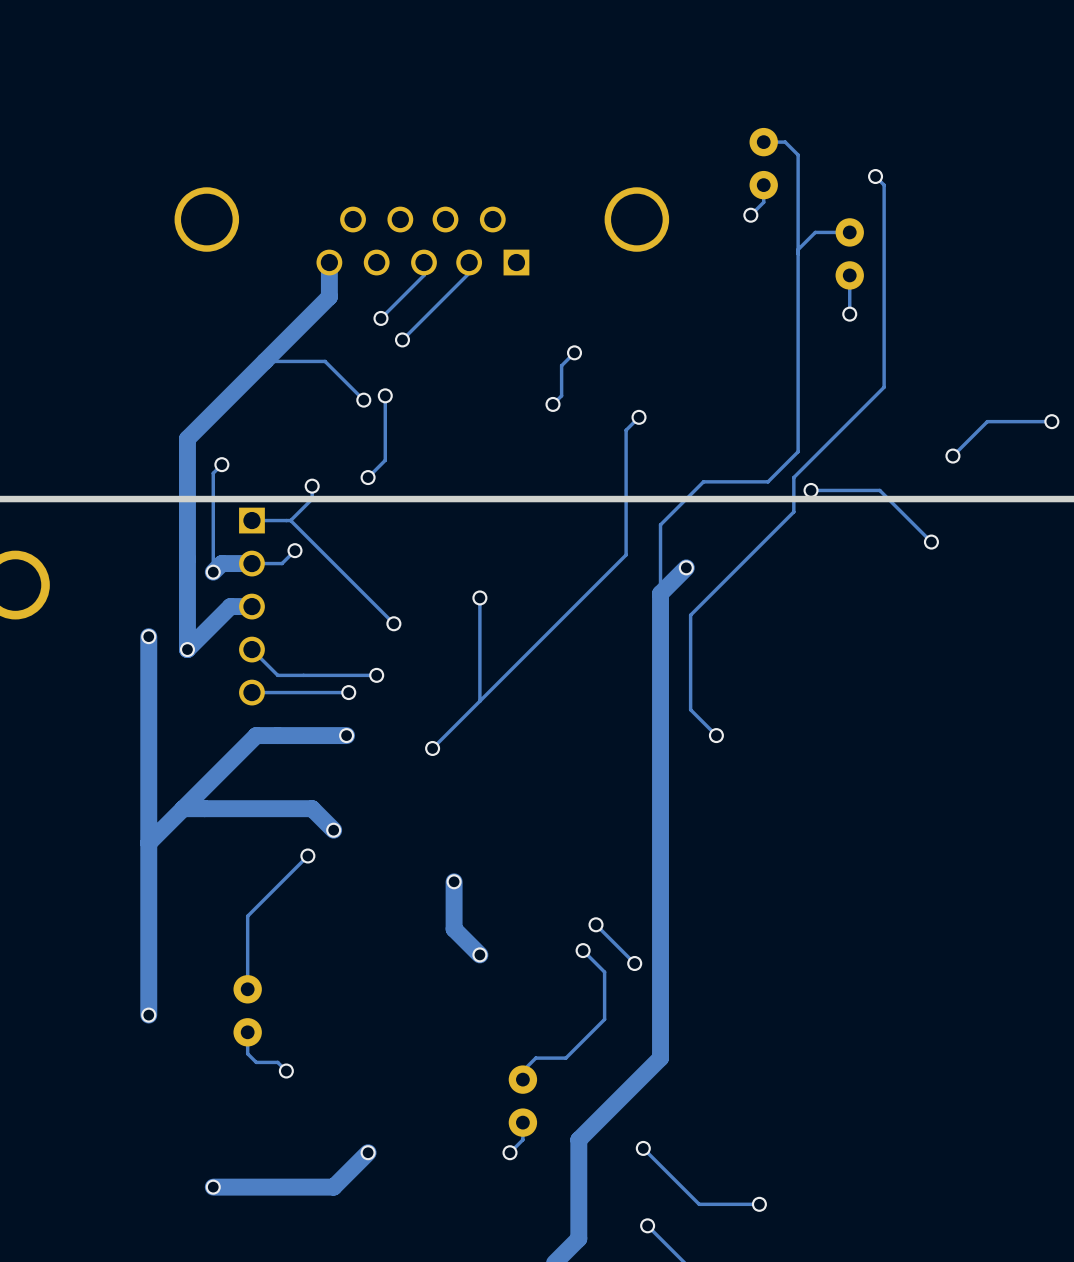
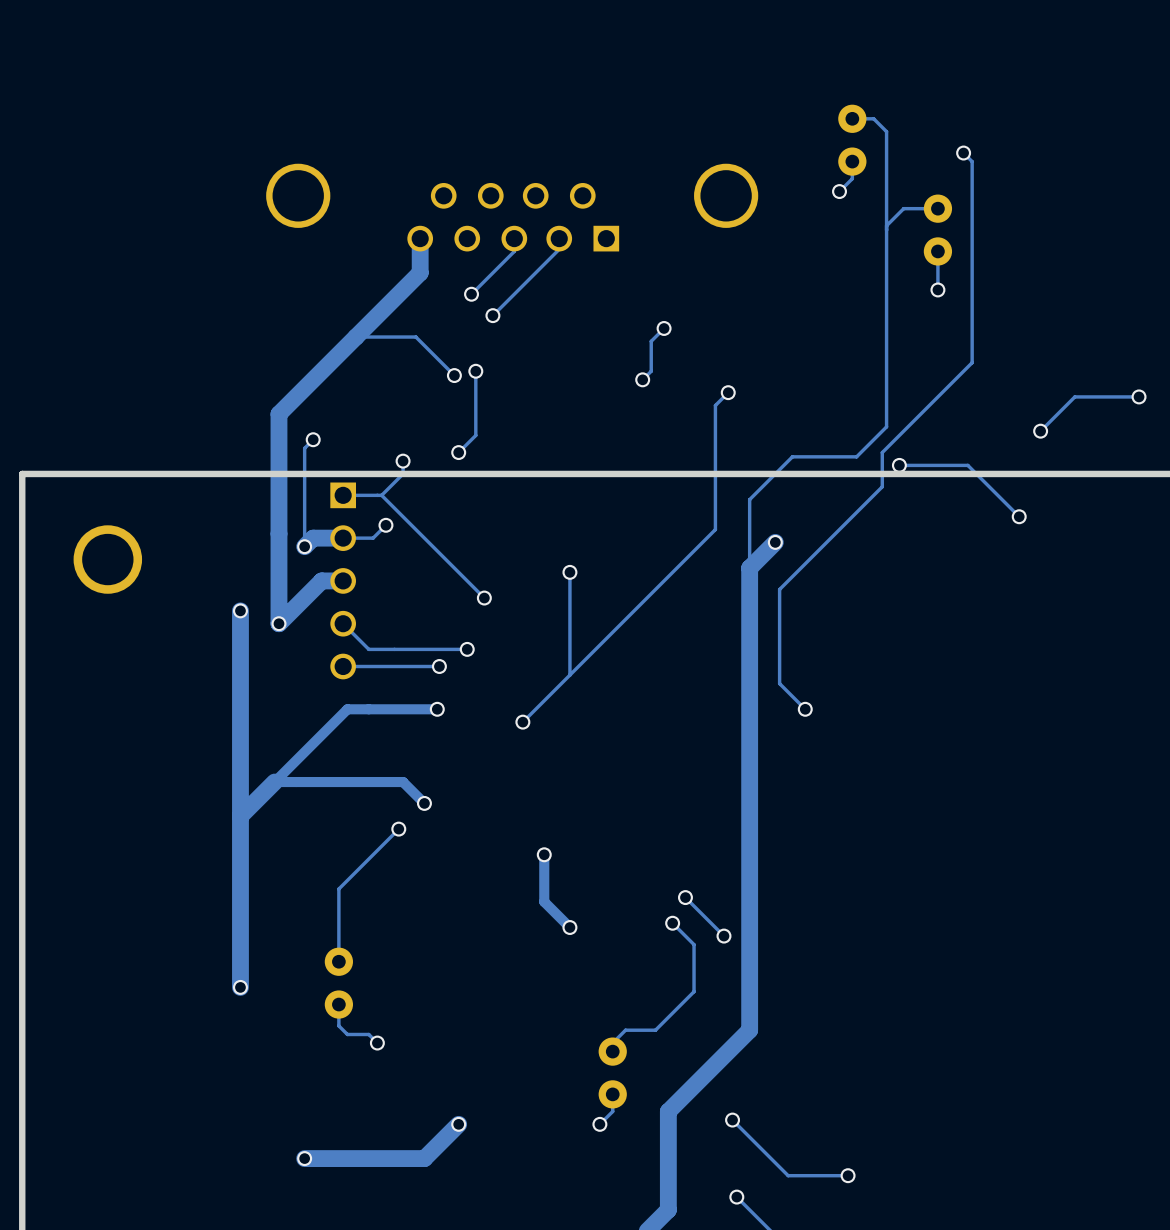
track width: thick (346, 735) (256, 735) (183, 808) (312, 808) (333, 830) -> thin (437, 709) (347, 709) (274, 782) (403, 782) (424, 803)
track width: thick (454, 881) (454, 929) (479, 954) -> thin (544, 854) (544, 901) (569, 927)

